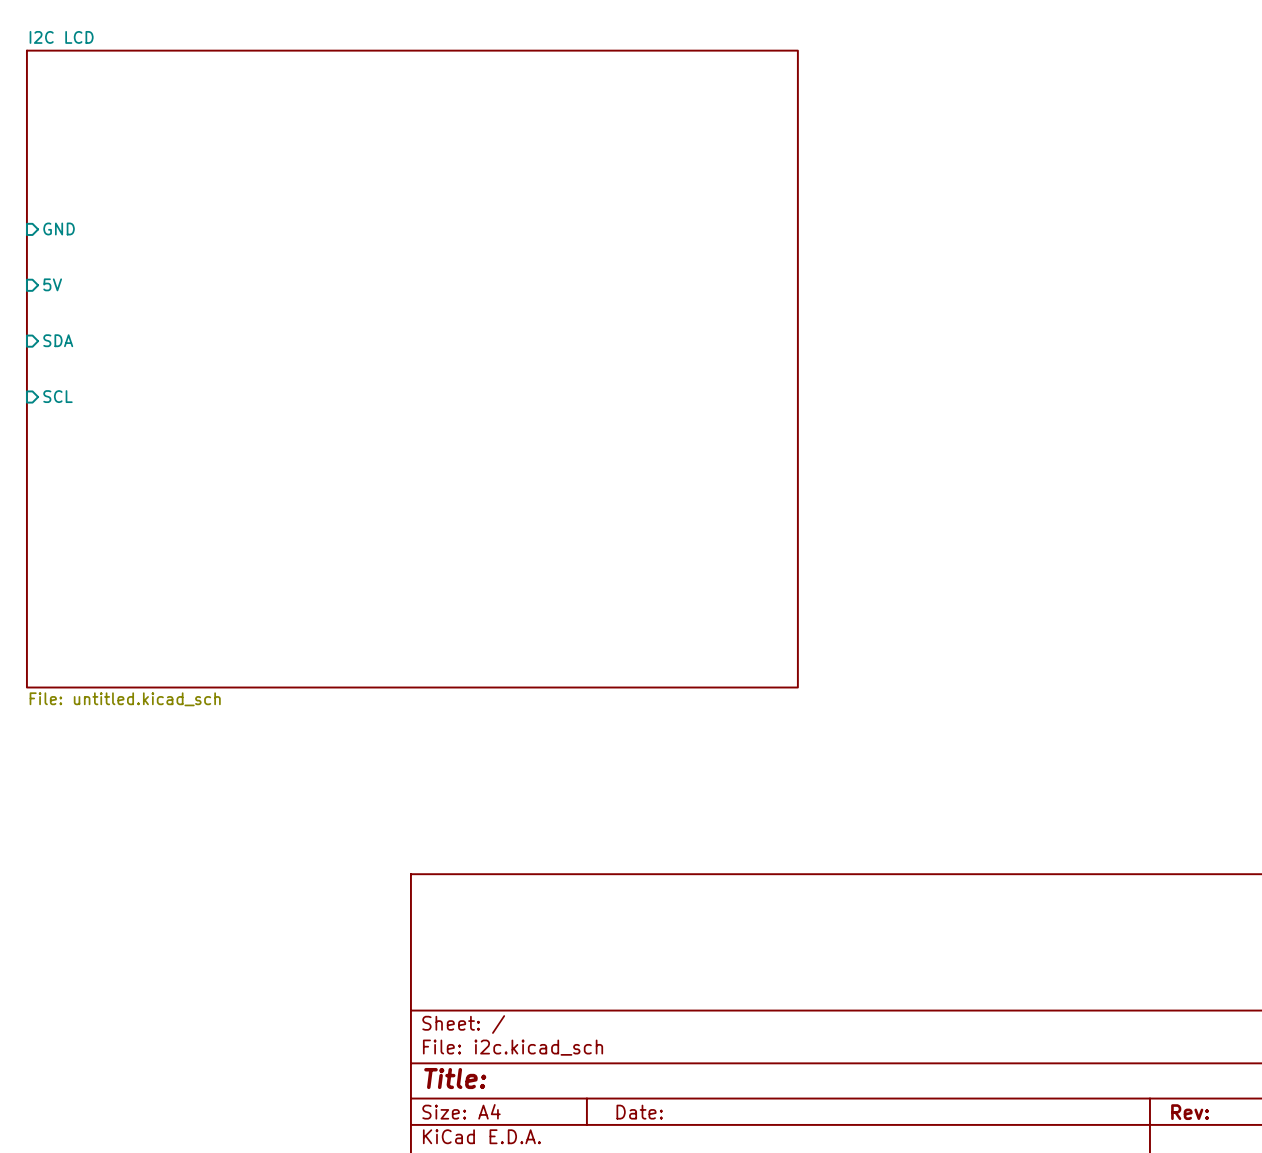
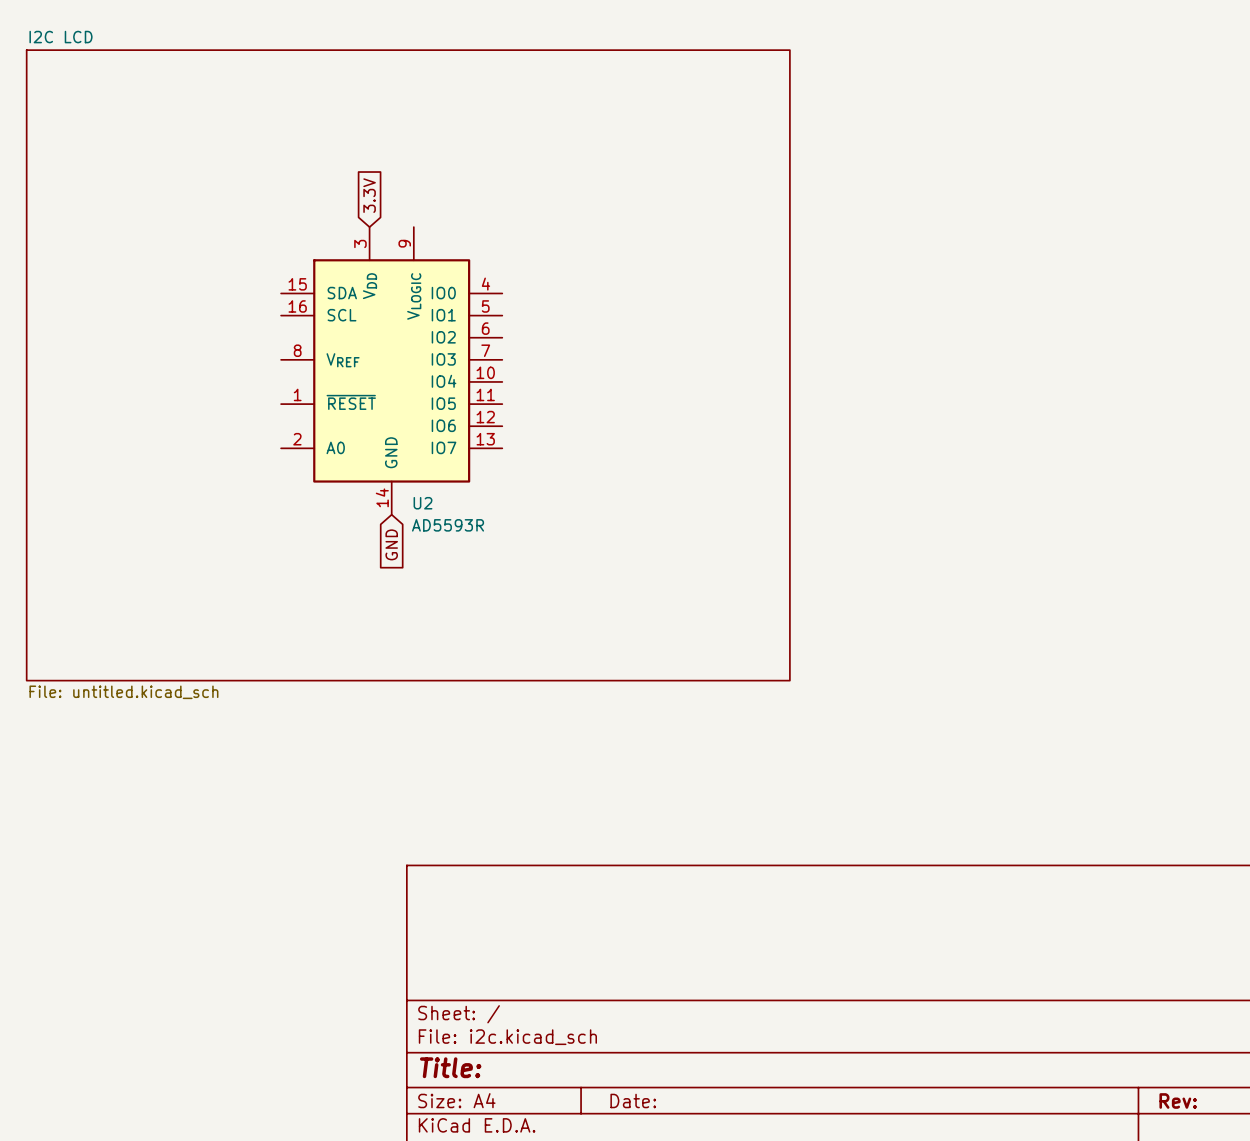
global label: none -> 3.3V (369, 195)
sheet pin: GND (59, 228) -> none
sheet pin: 5V (52, 284) -> none
sheet pin: SDA (58, 340) -> none
U2: none -> AD5593R (391, 370)
sheet pin: SCL (57, 396) -> none
global label: none -> GND (391, 544)

